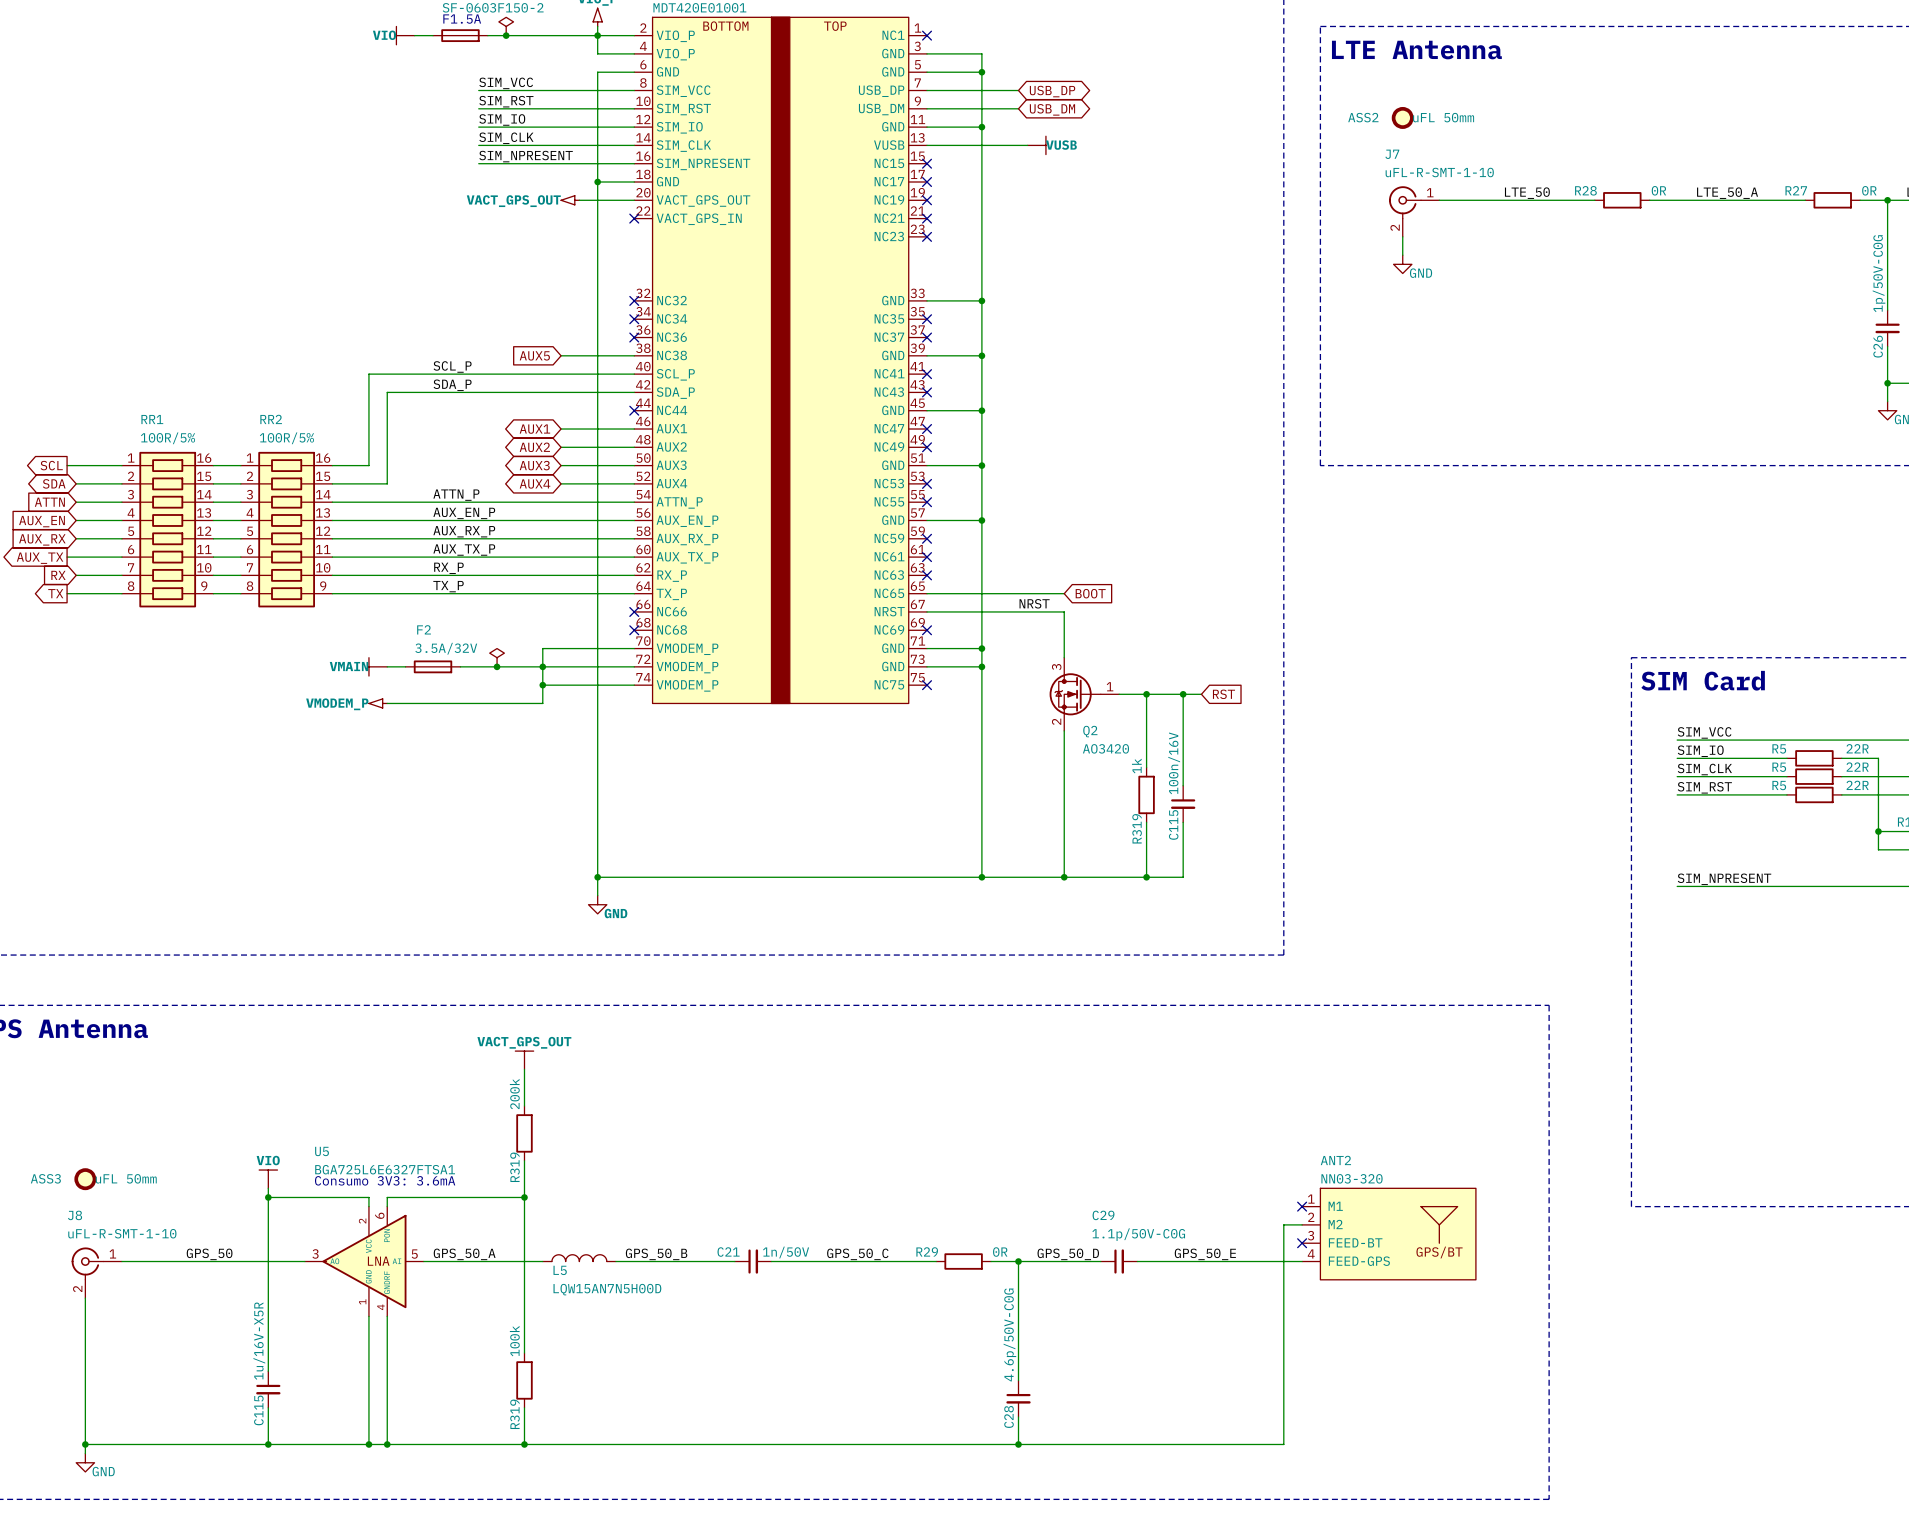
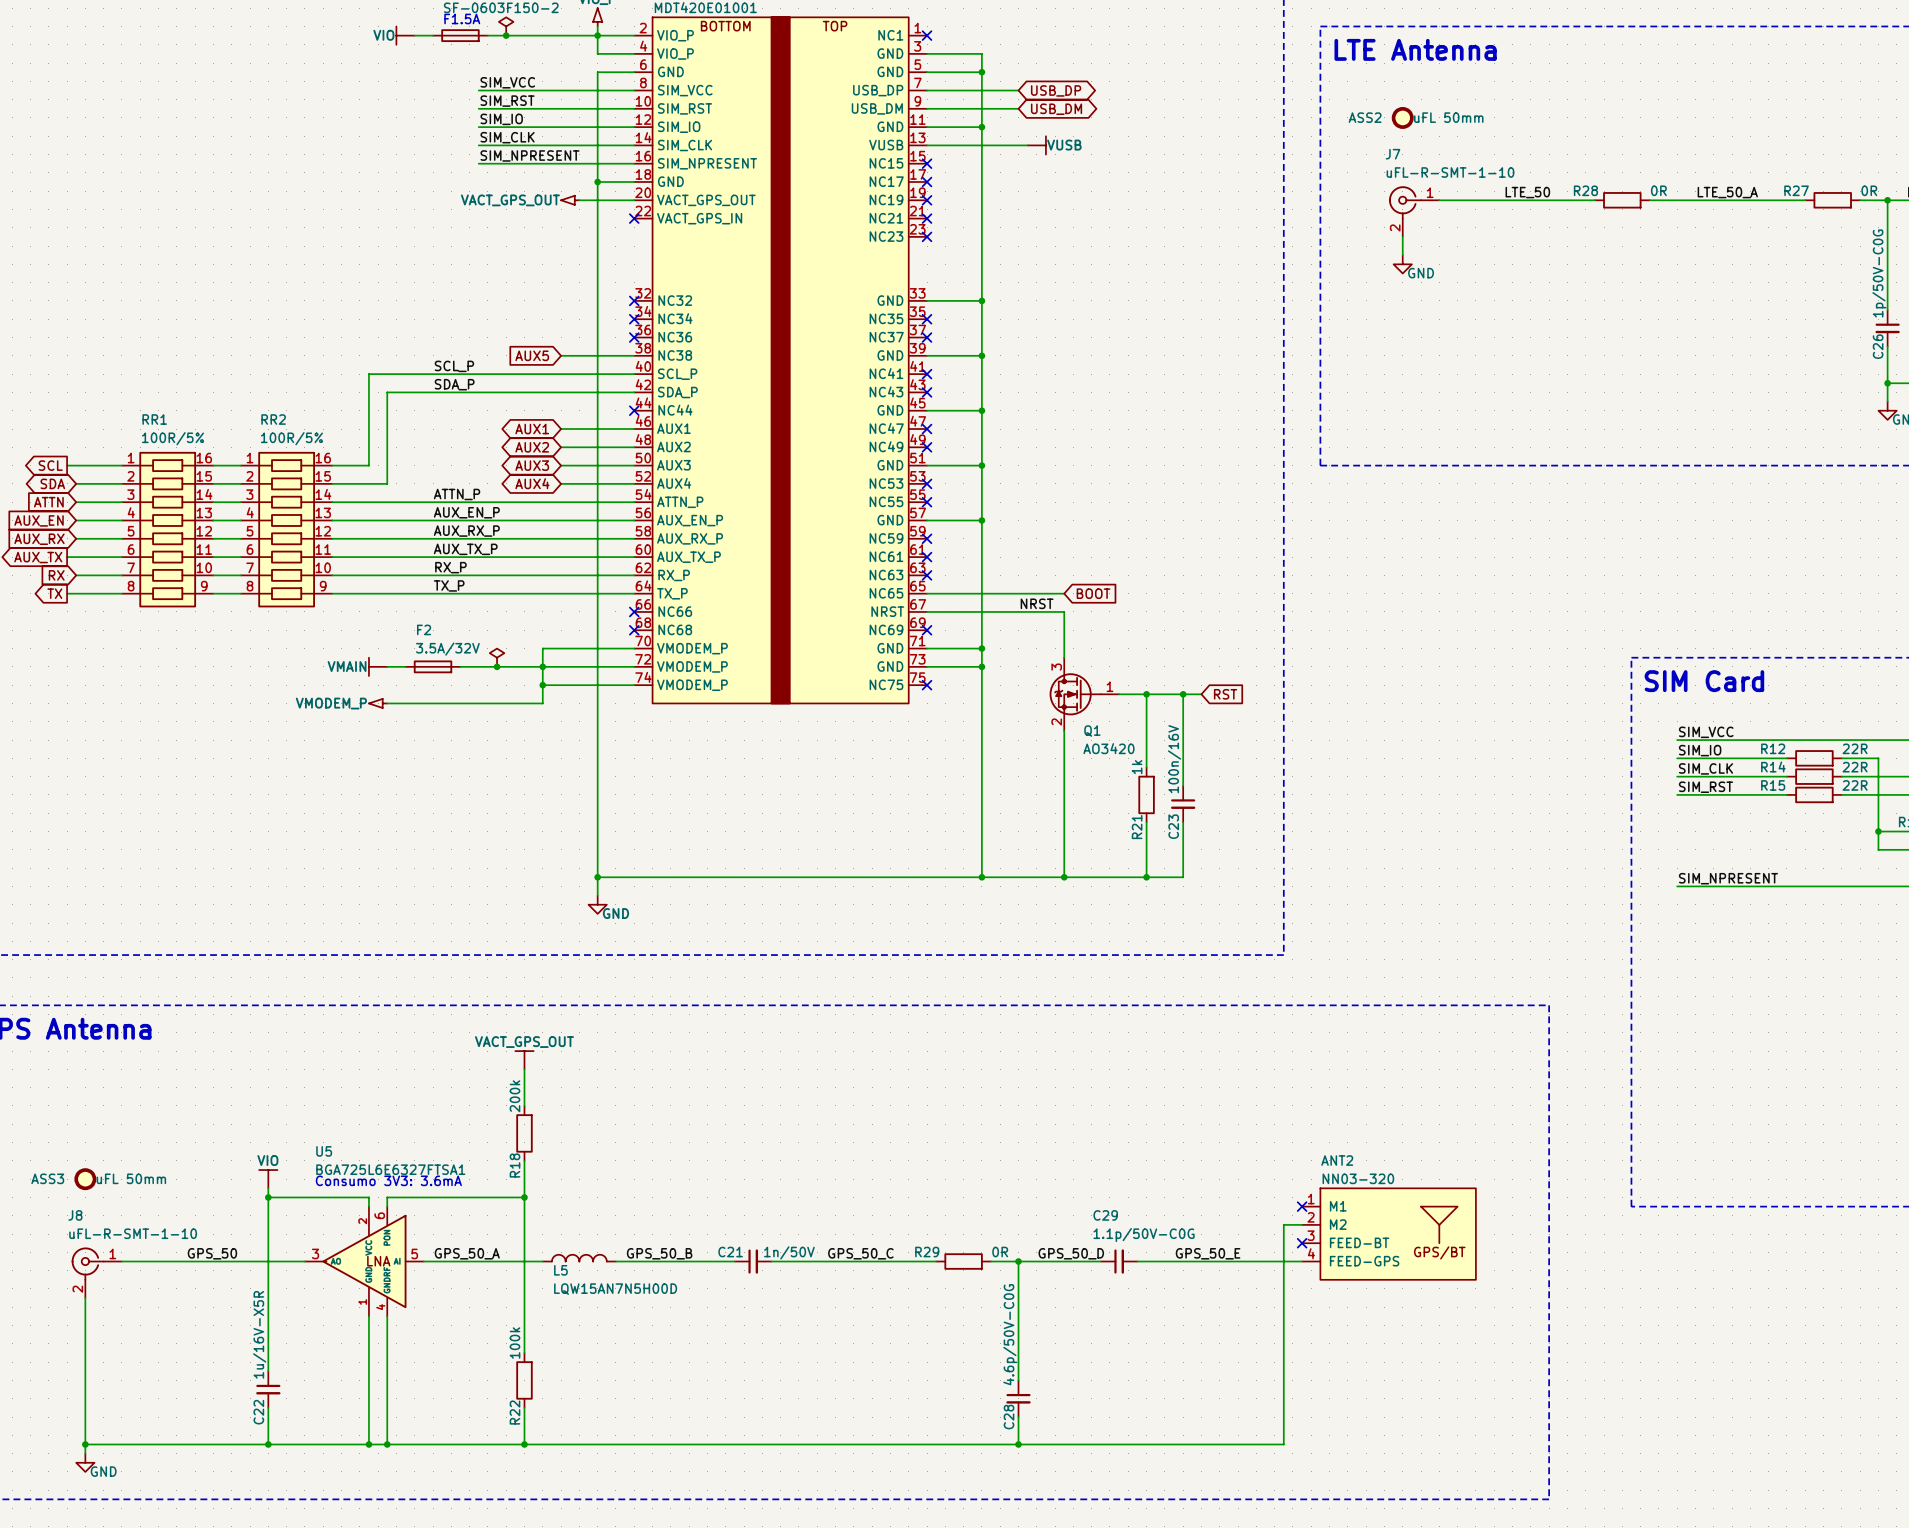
Q2 name: Q2 (1090, 731) -> Q1 (1092, 731)
R5 name: R5 (1779, 748) -> R12 (1773, 748)
R5 name: R5 (1779, 767) -> R14 (1773, 766)
R5 name: R5 (1779, 785) -> R15 (1773, 785)
C115 name: C115 (1173, 824) -> C23 (1173, 826)
R319 name: R319 (1137, 828) -> R21 (1137, 827)
R319 name: R319 (514, 1167) -> R18 (514, 1165)
C115 name: C115 (258, 1410) -> C22 (258, 1412)
R319 name: R319 (514, 1414) -> R22 (514, 1412)

